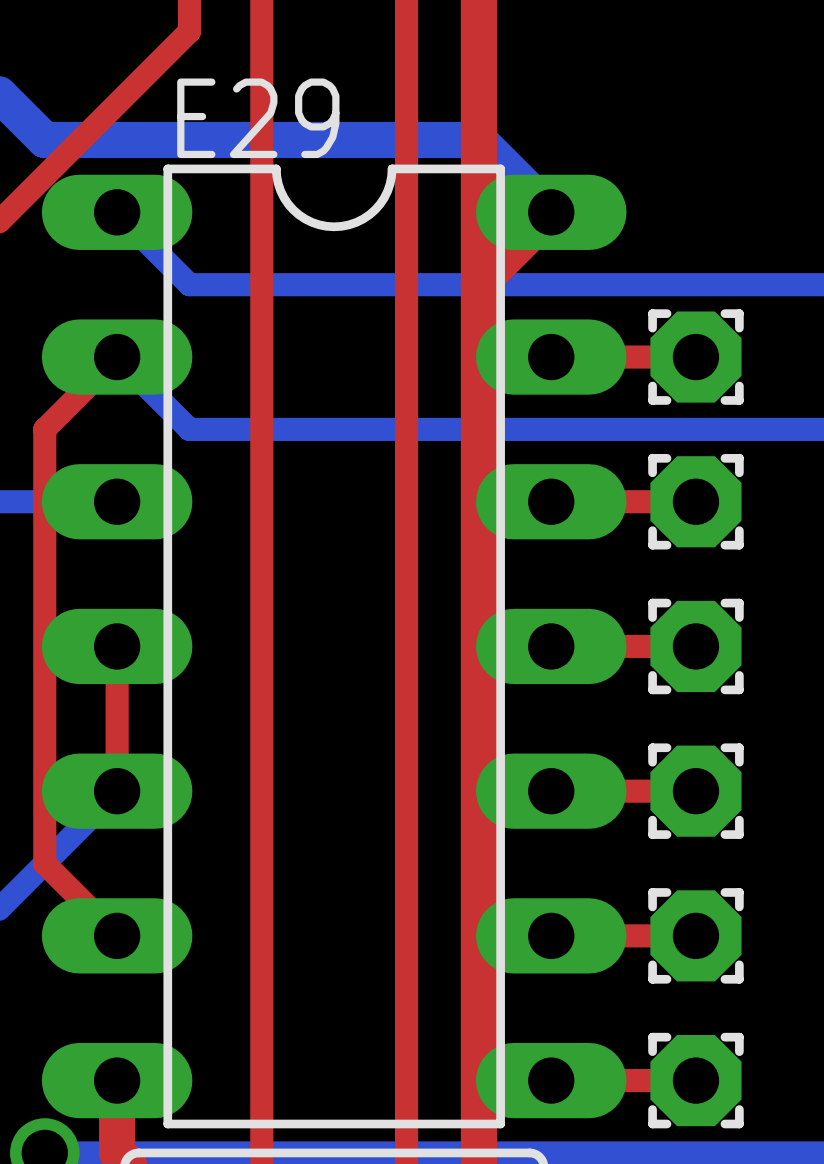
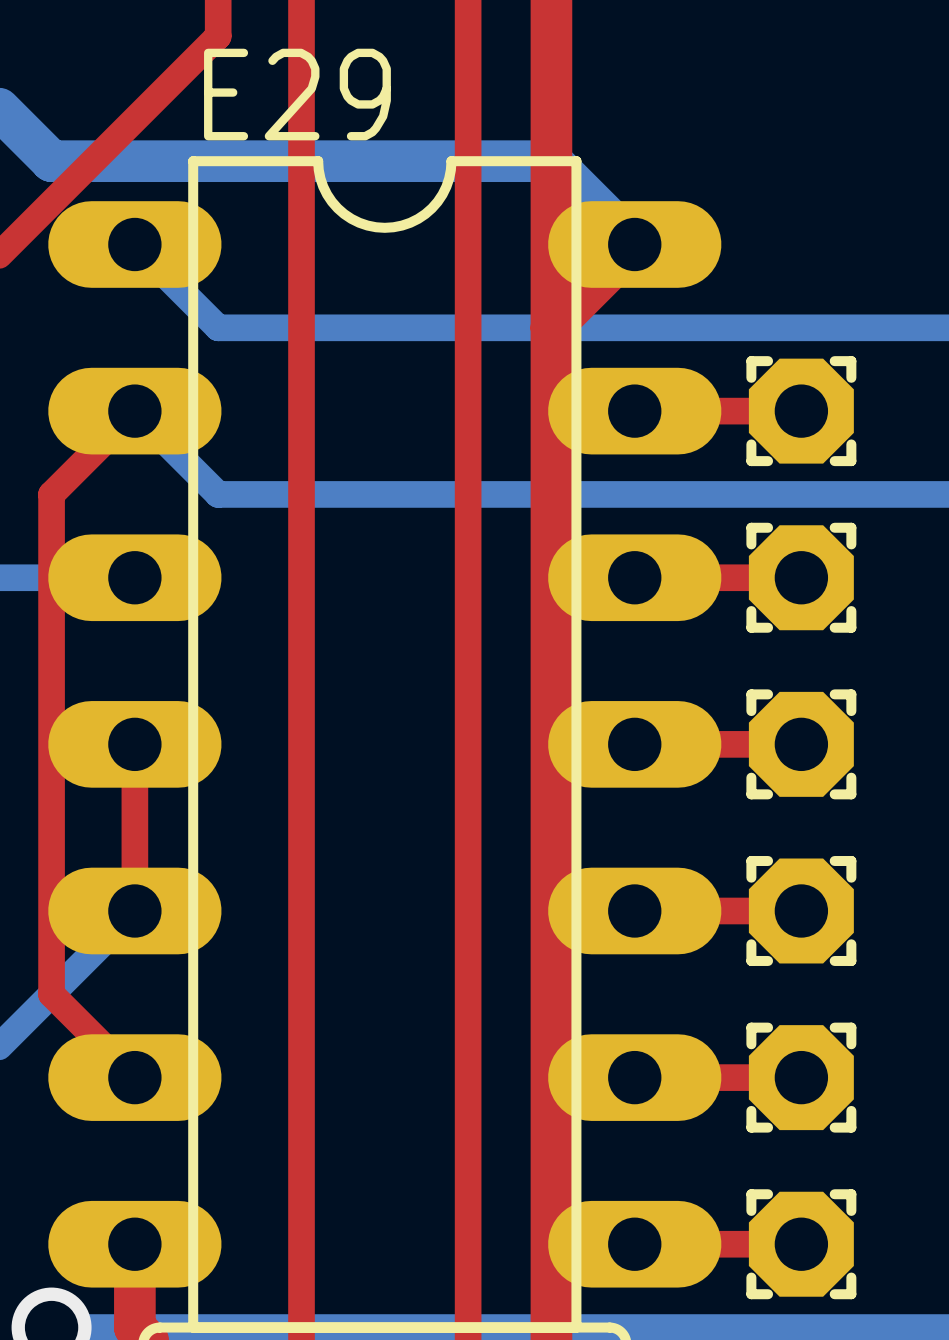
E29 name position: E29 (258, 118) -> E29 (297, 94)
E29 footprint: [41, 164, 627, 1129] -> [48, 156, 722, 1333]

